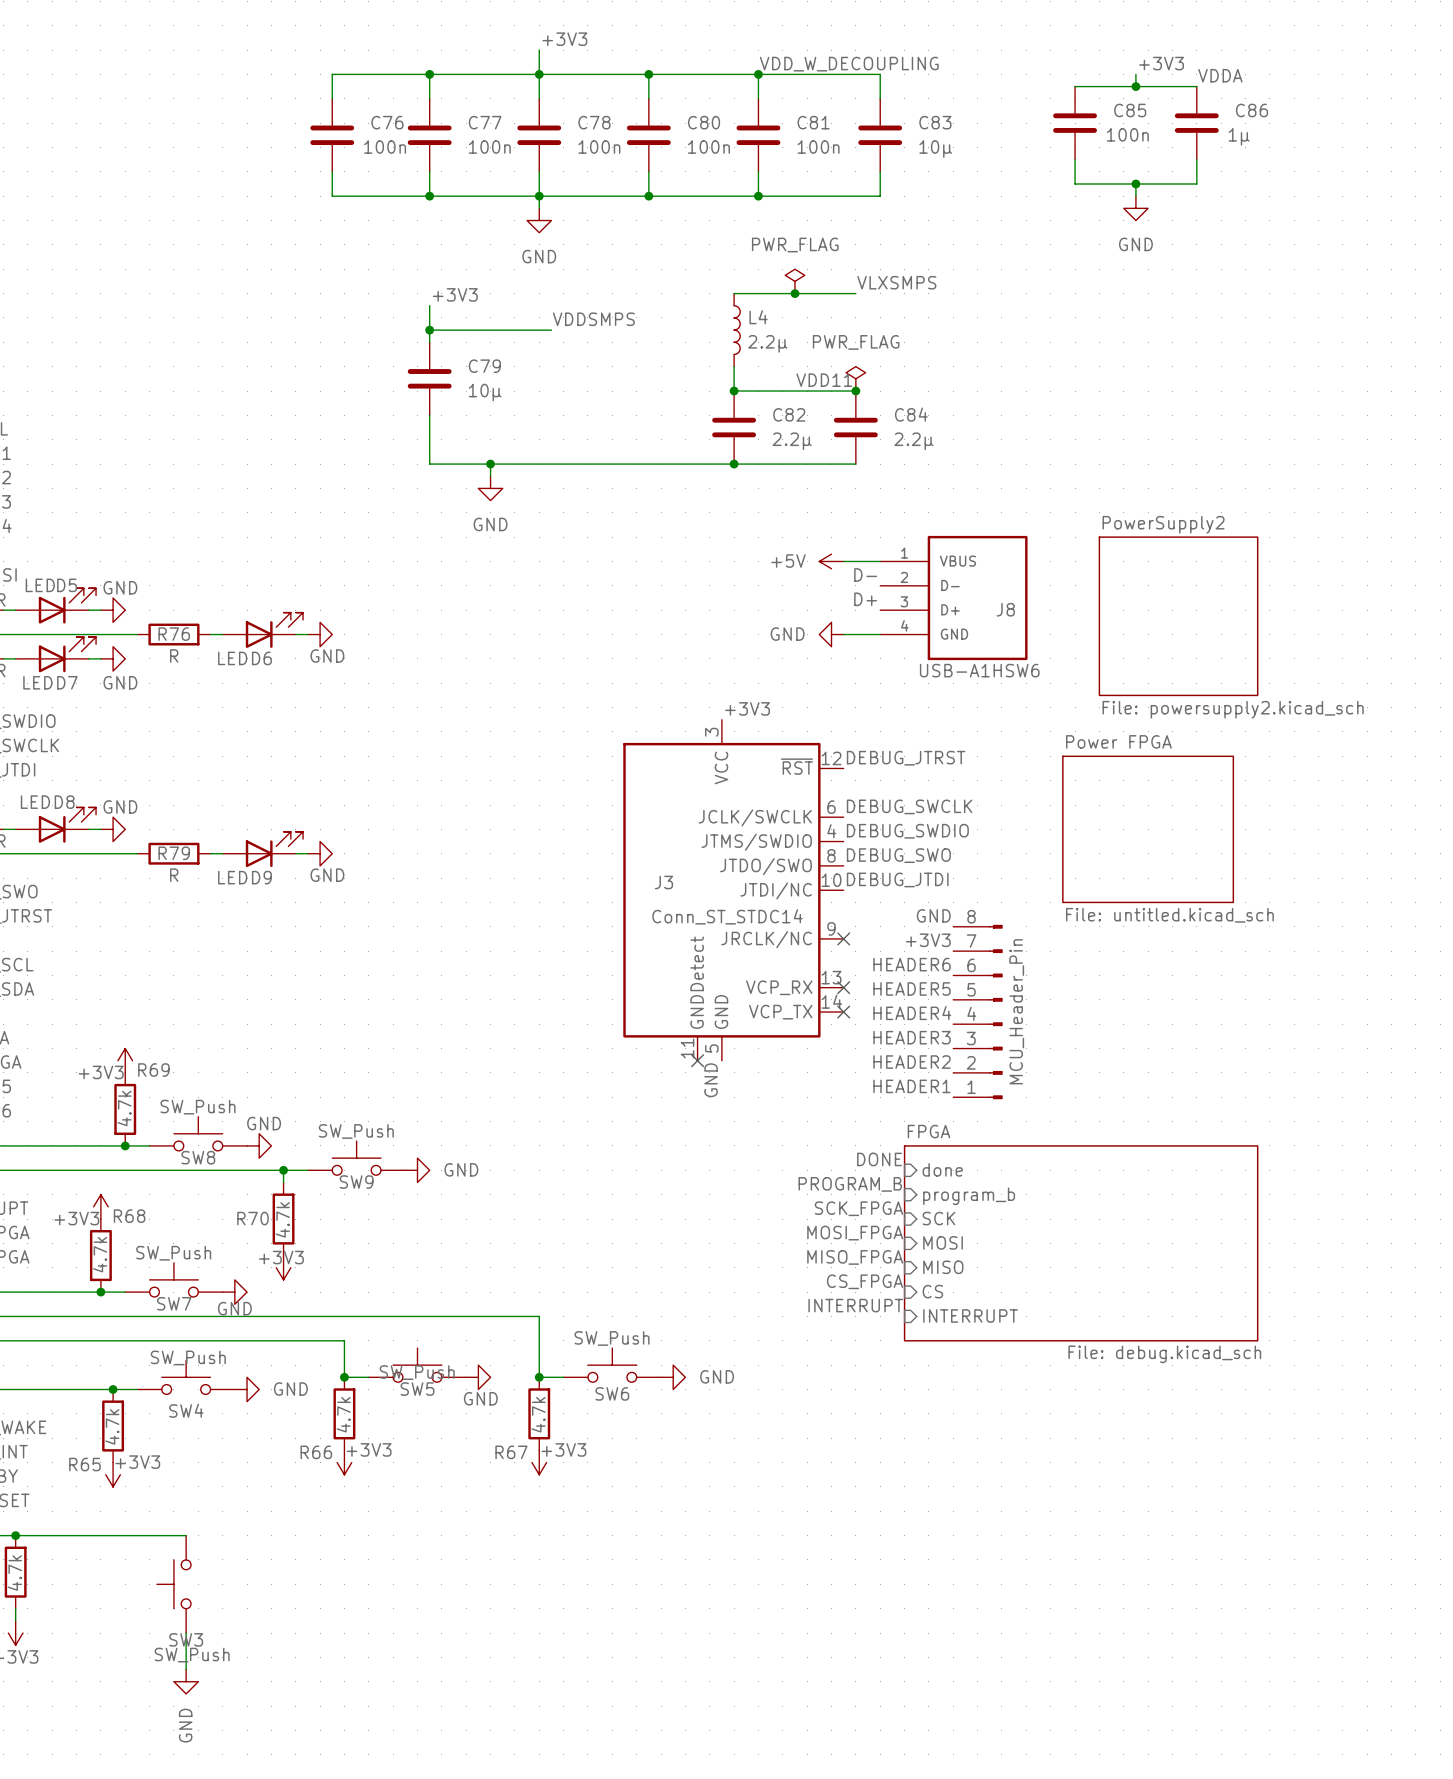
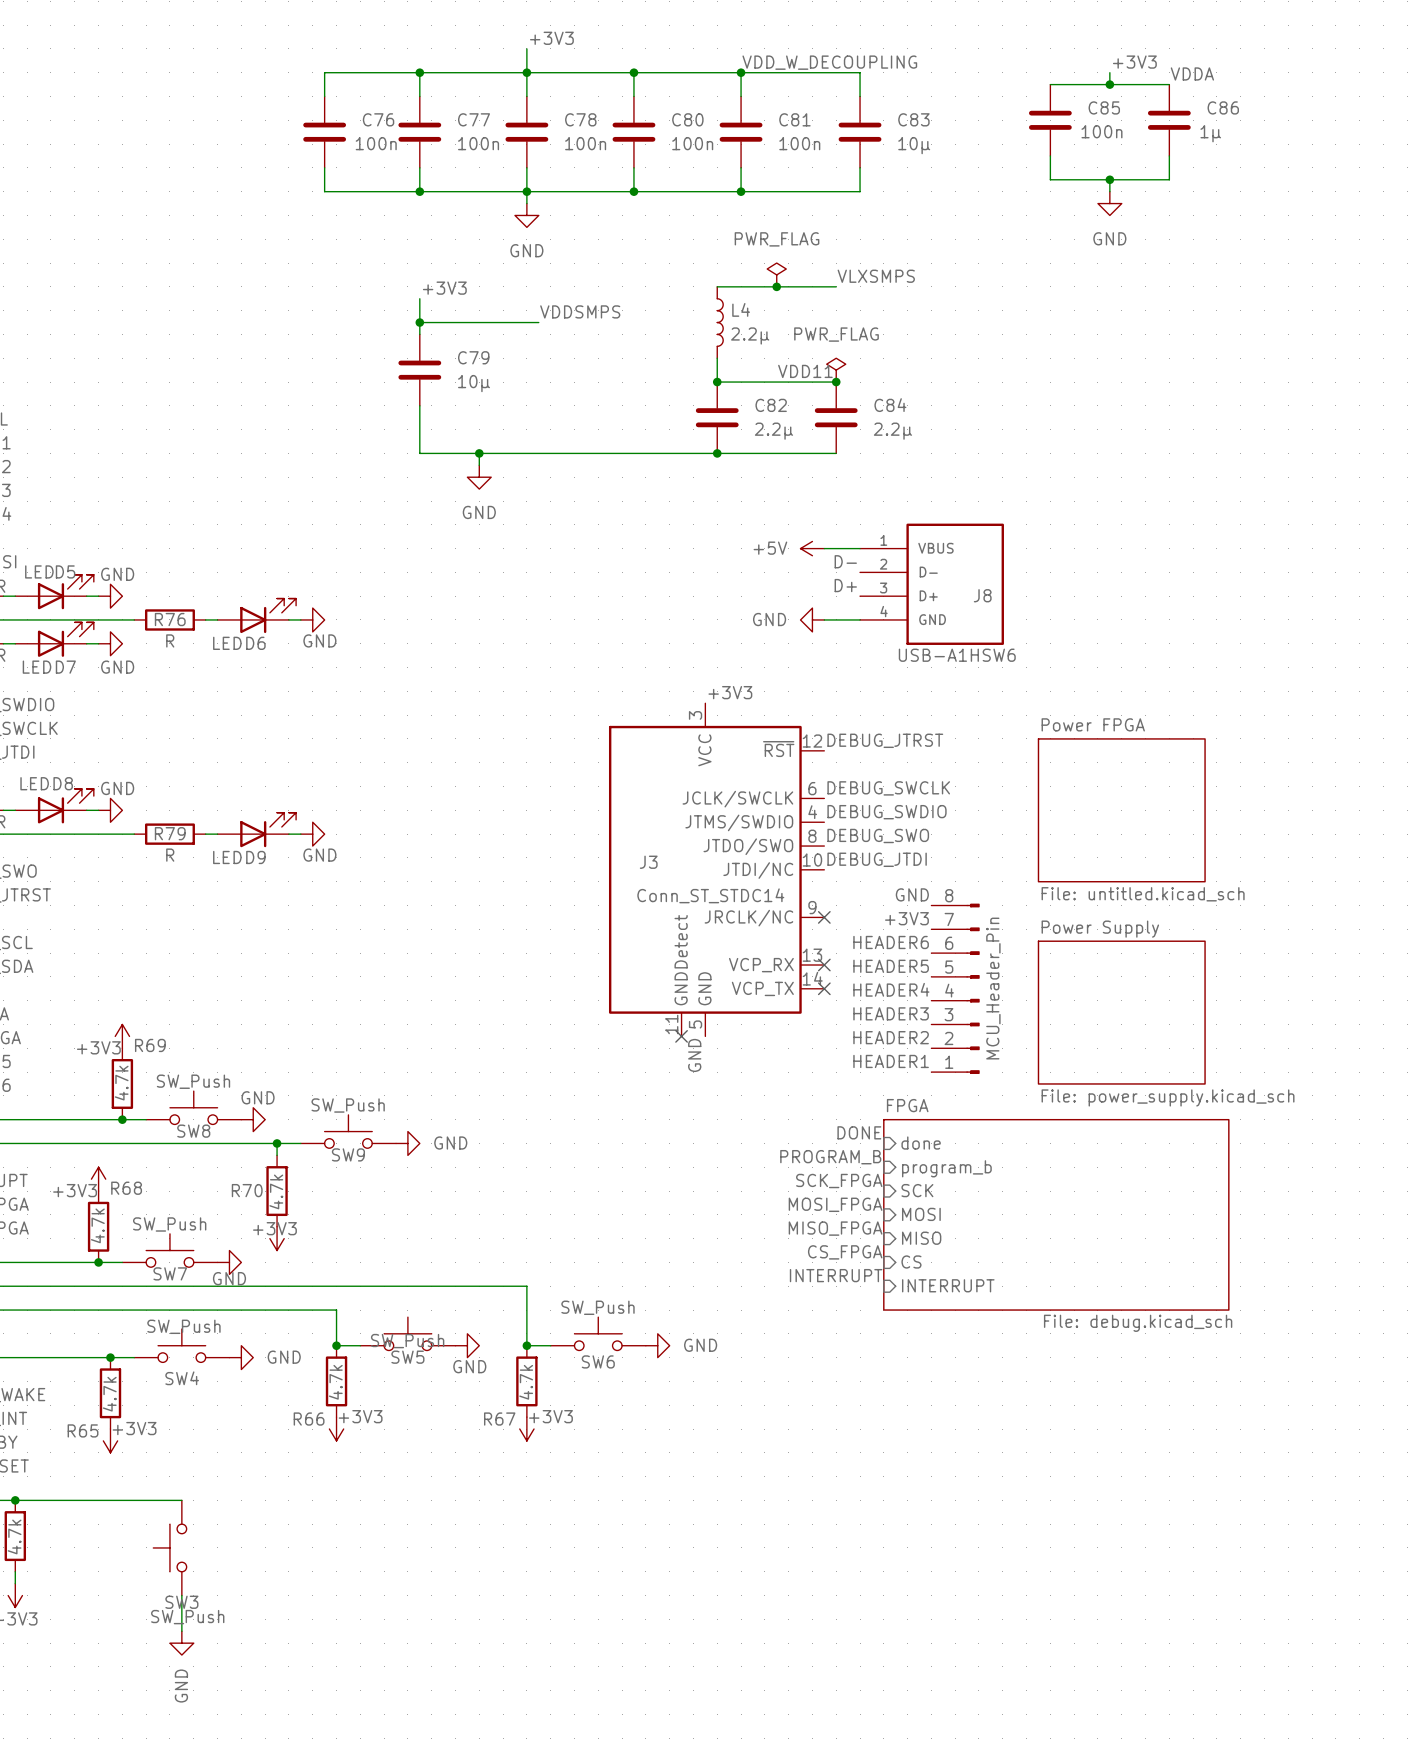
sheet PowerSupply2: File: powersupply2.kicad_sch (1178, 616) -> none
sheet Power Supply: none -> File: power_supply.kicad_sch (1121, 1012)

